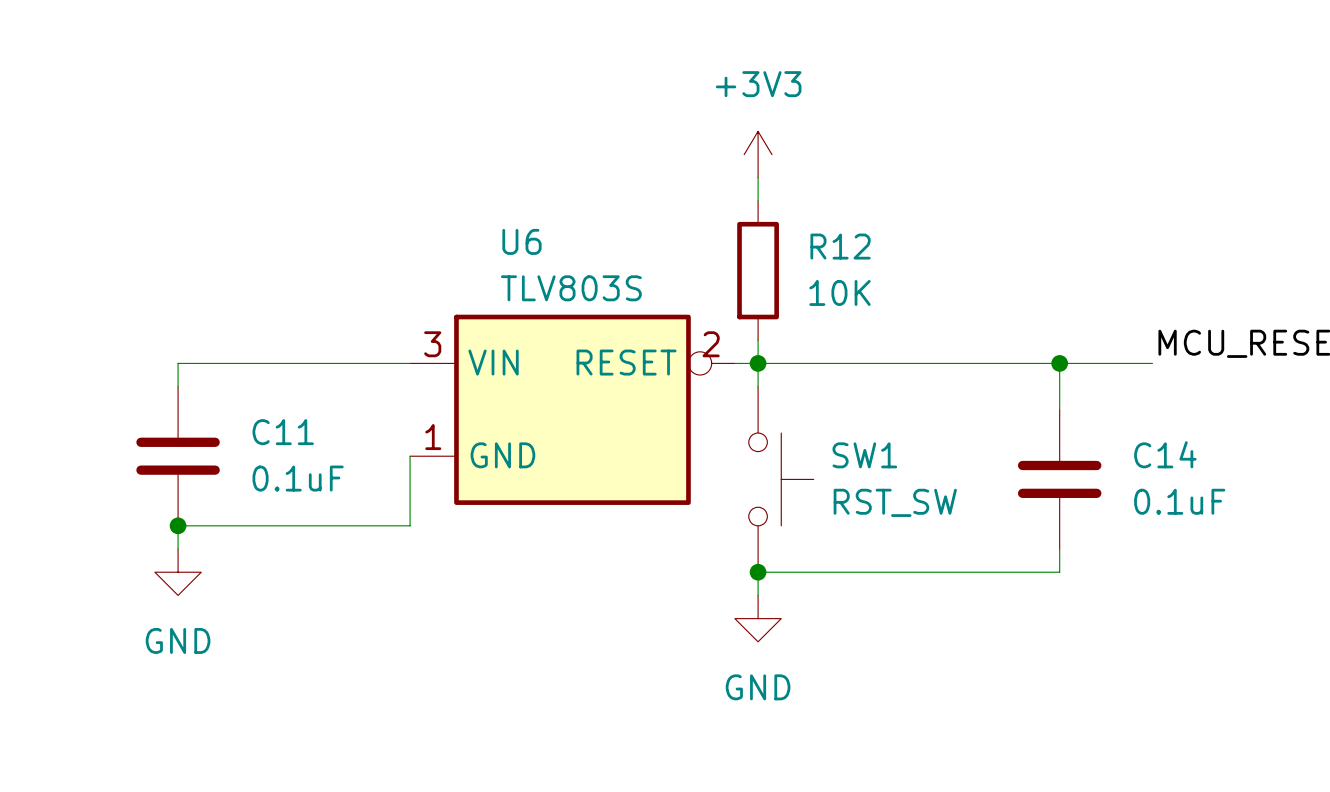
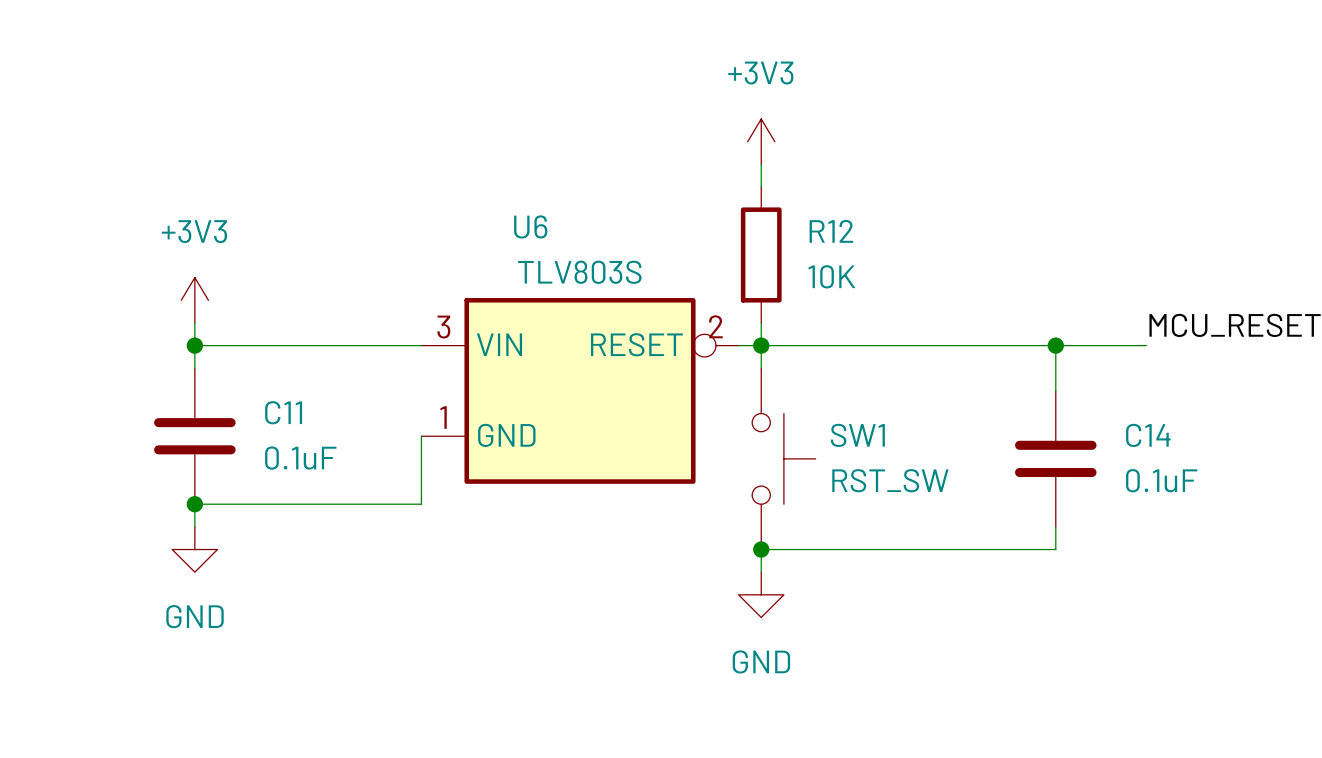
power symbol: none -> +3V3 (194, 300)
wire: none -> (194, 322) (194, 345)
junction: none -> (194, 345)

